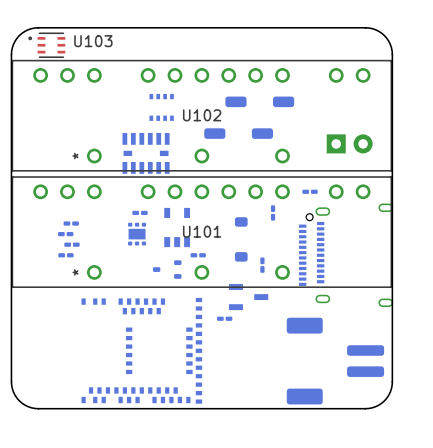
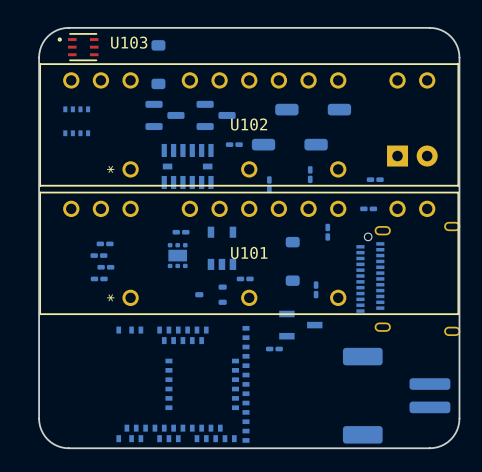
part: none -> (158, 64)
part footprint: [149, 93, 174, 121] -> [196, 100, 236, 131]
part: none -> (164, 115)
part: none -> (76, 121)
part: none -> (234, 144)
part: none -> (310, 174)
part: none -> (375, 179)
part: none -> (269, 184)

